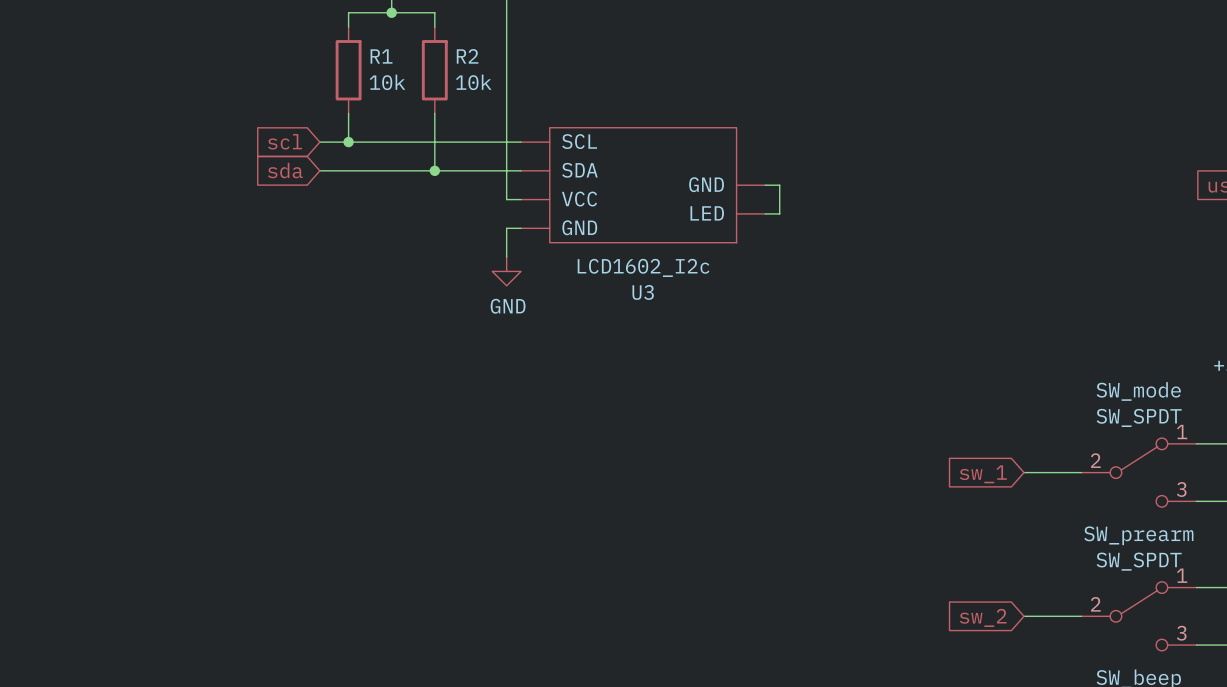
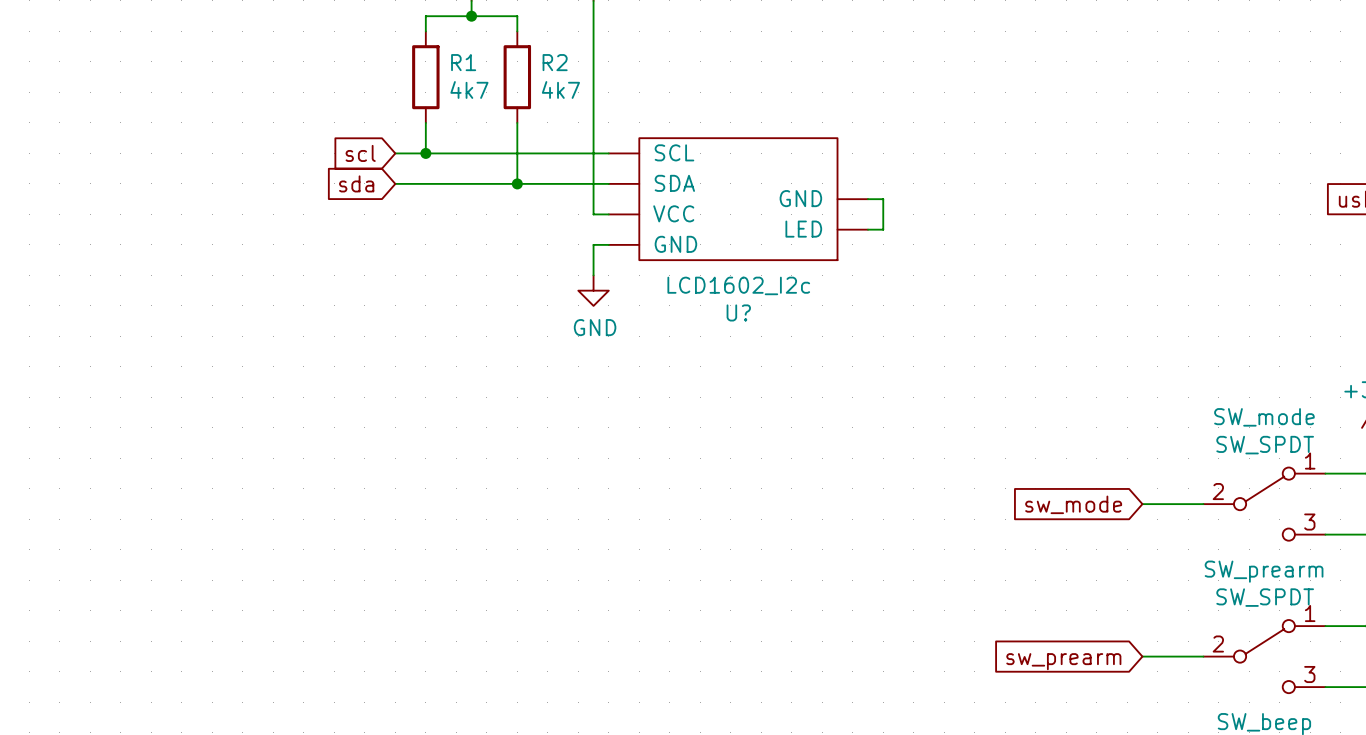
R1 value: 10k (387, 82) -> 4k7 (469, 89)
R2 value: 10k (473, 82) -> 4k7 (560, 89)
U3 name: U3 (643, 292) -> U? (738, 312)
global label: sw_1 (983, 474) -> sw_mode (1073, 504)
global label: sw_2 (983, 617) -> sw_prearm (1063, 661)

